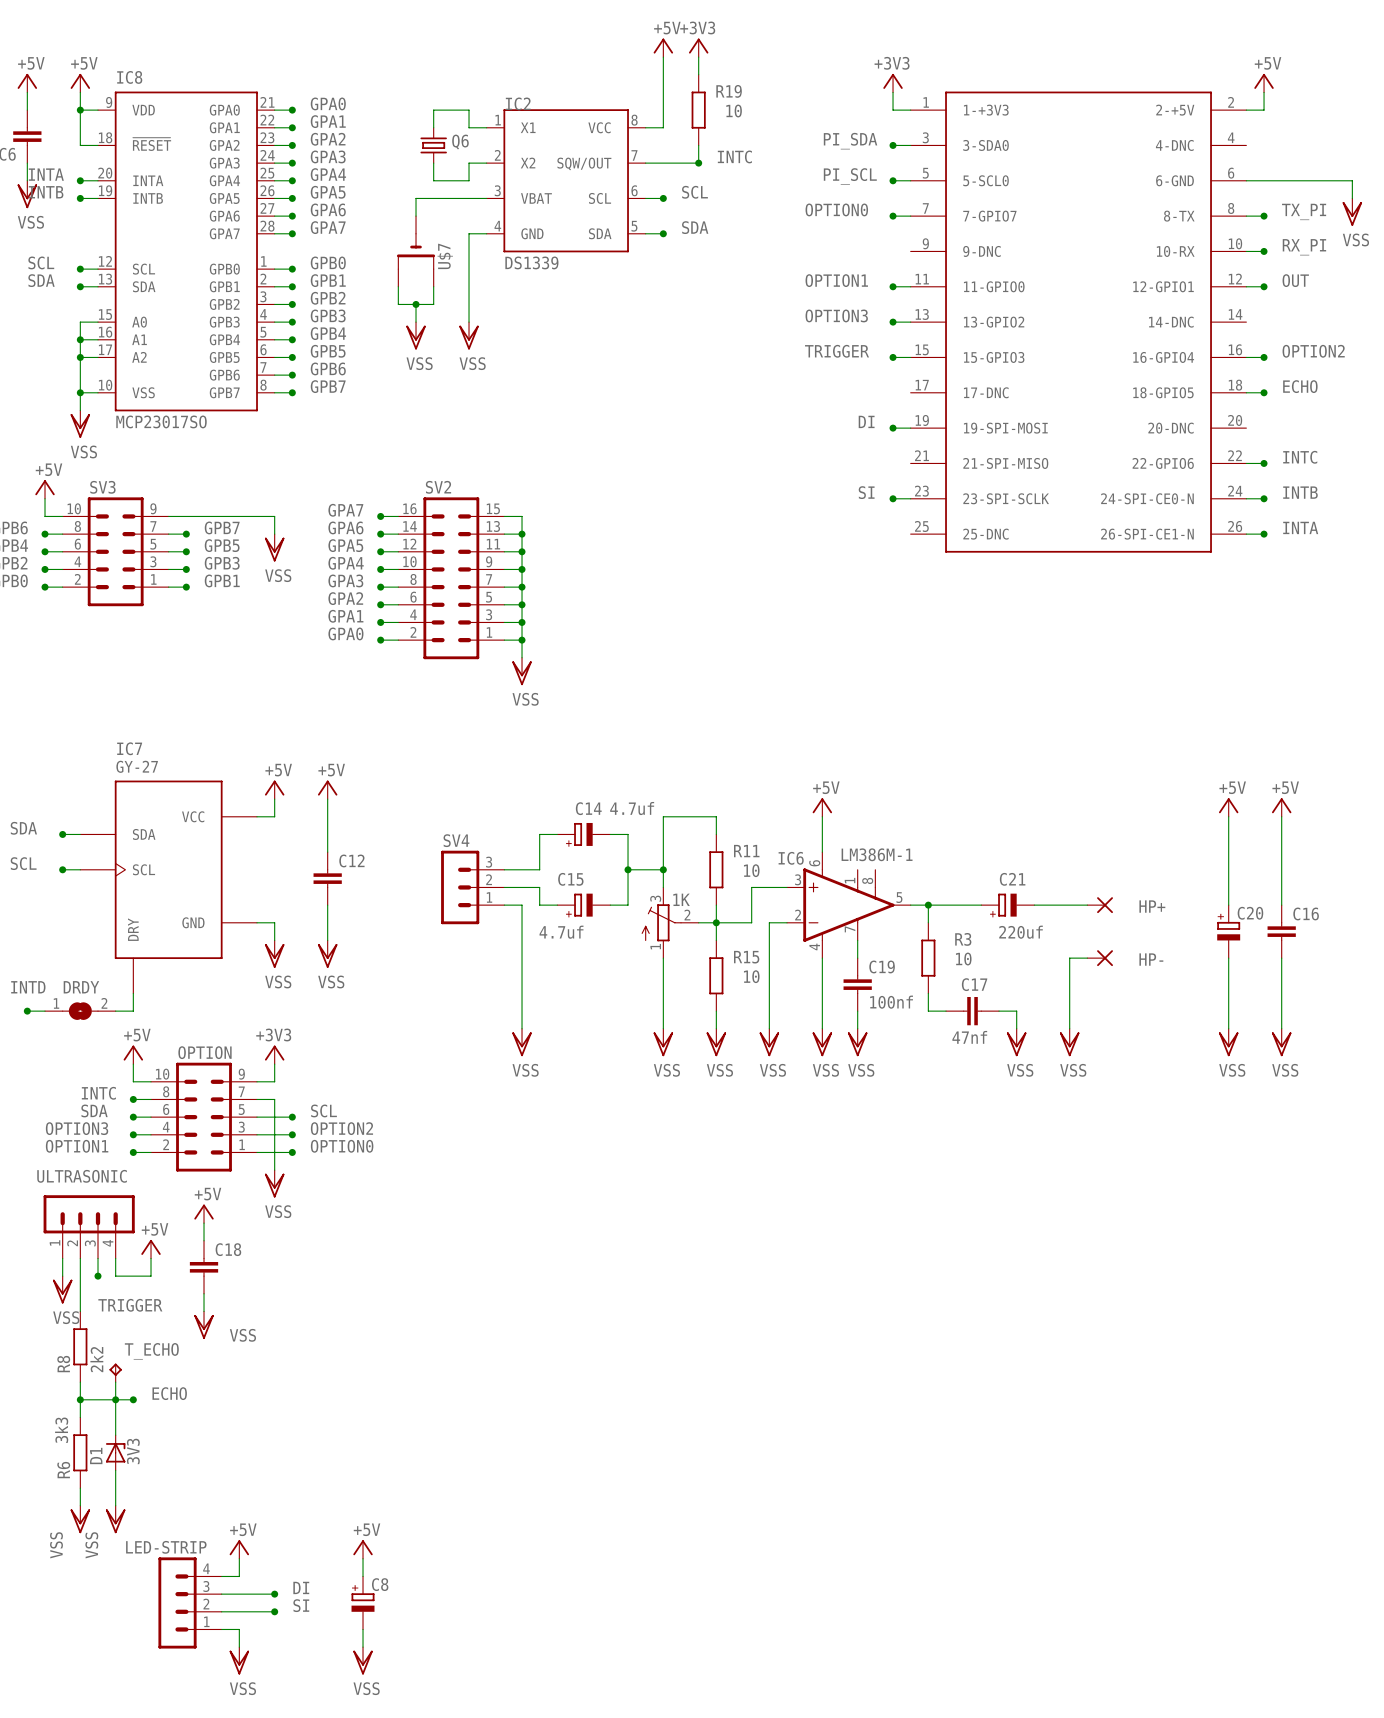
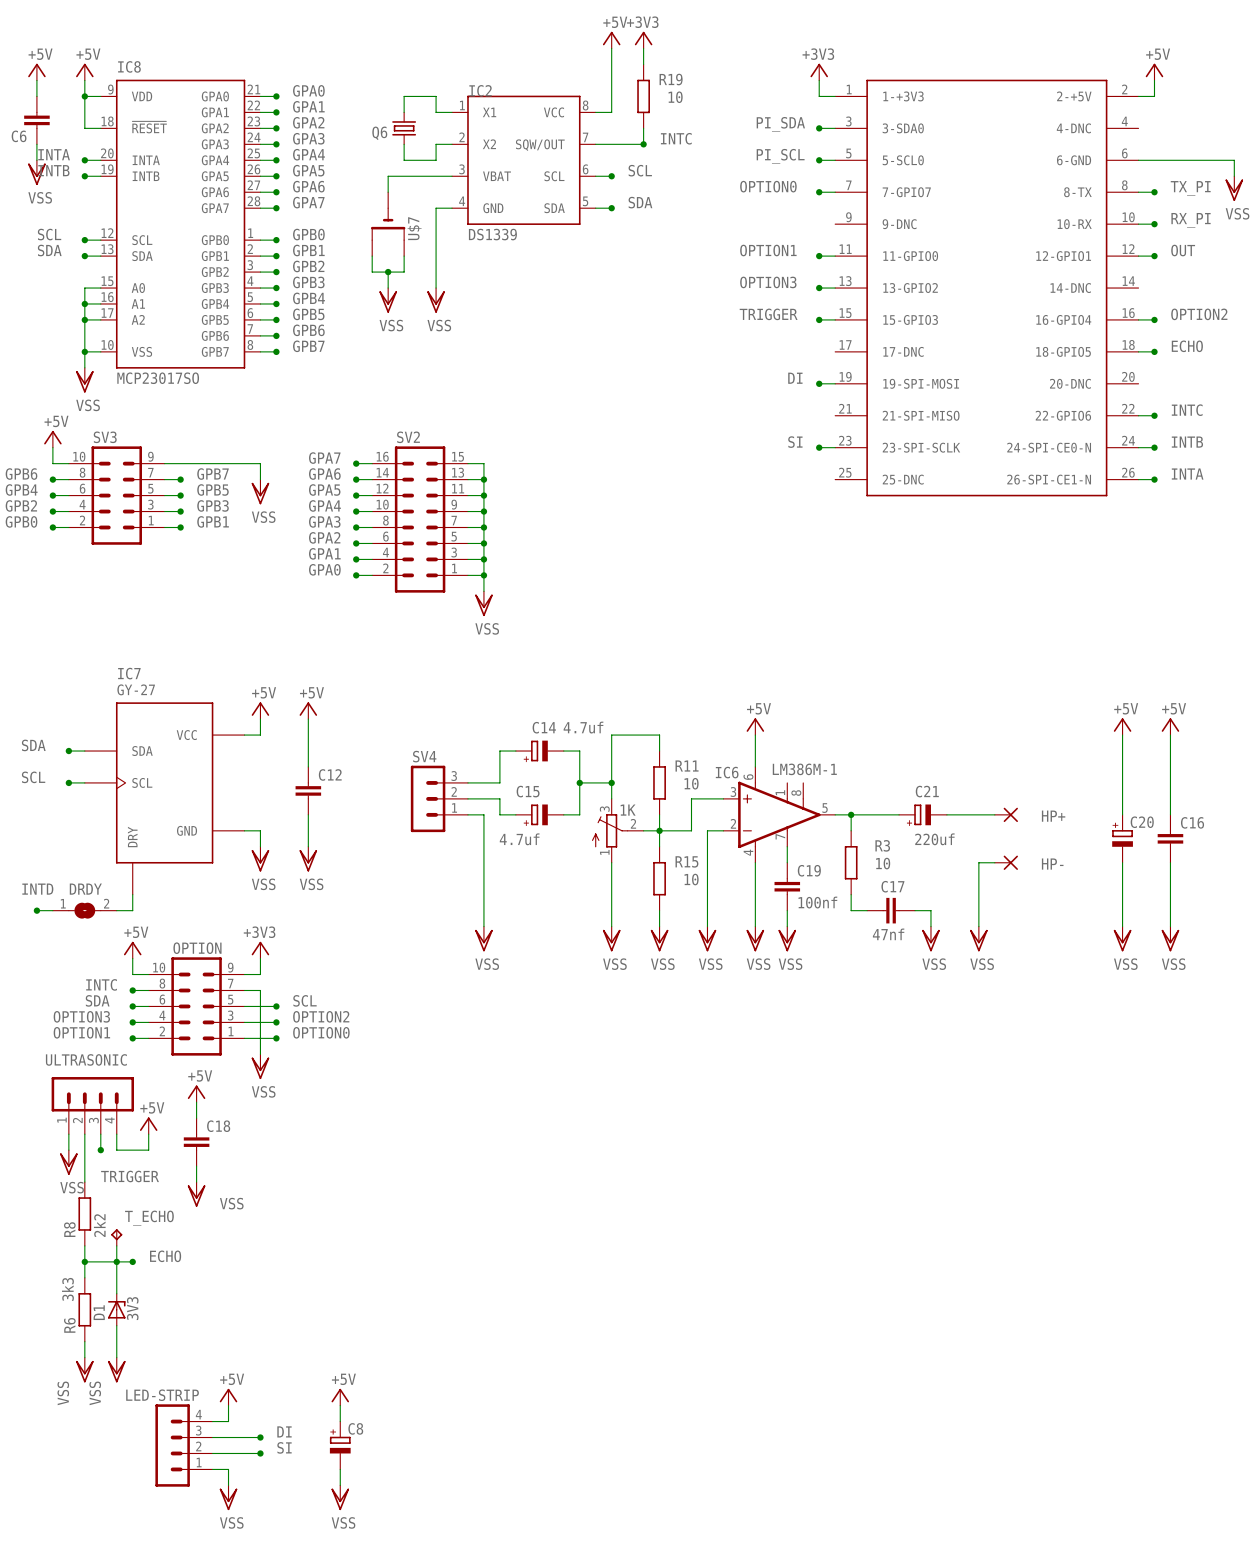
Q6 name position: Q6 (460, 142) -> Q6 (379, 133)

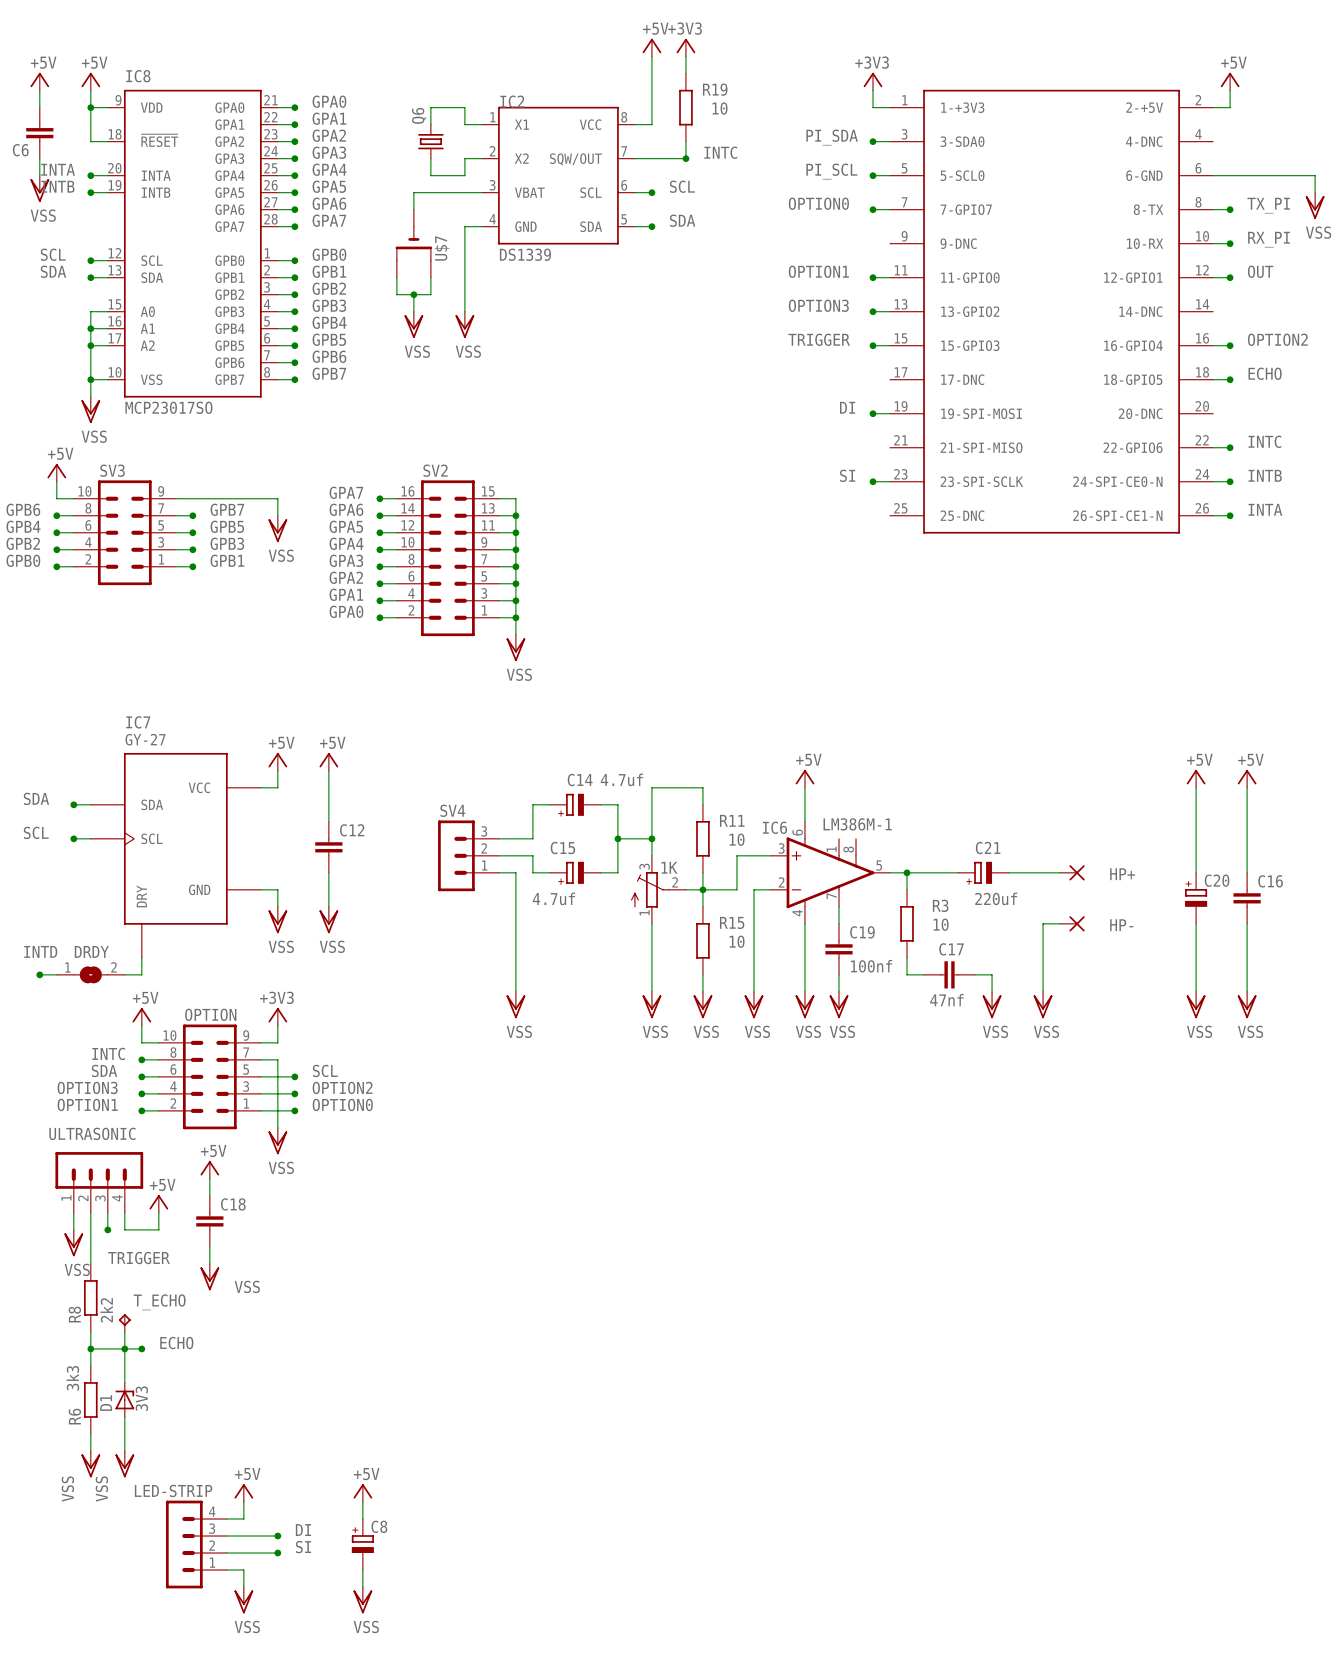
Q6 name rotation: 0° (379, 133) -> 90° counterclockwise (419, 115)
Q6 name position: Q6 (379, 133) -> Q6 (419, 115)

